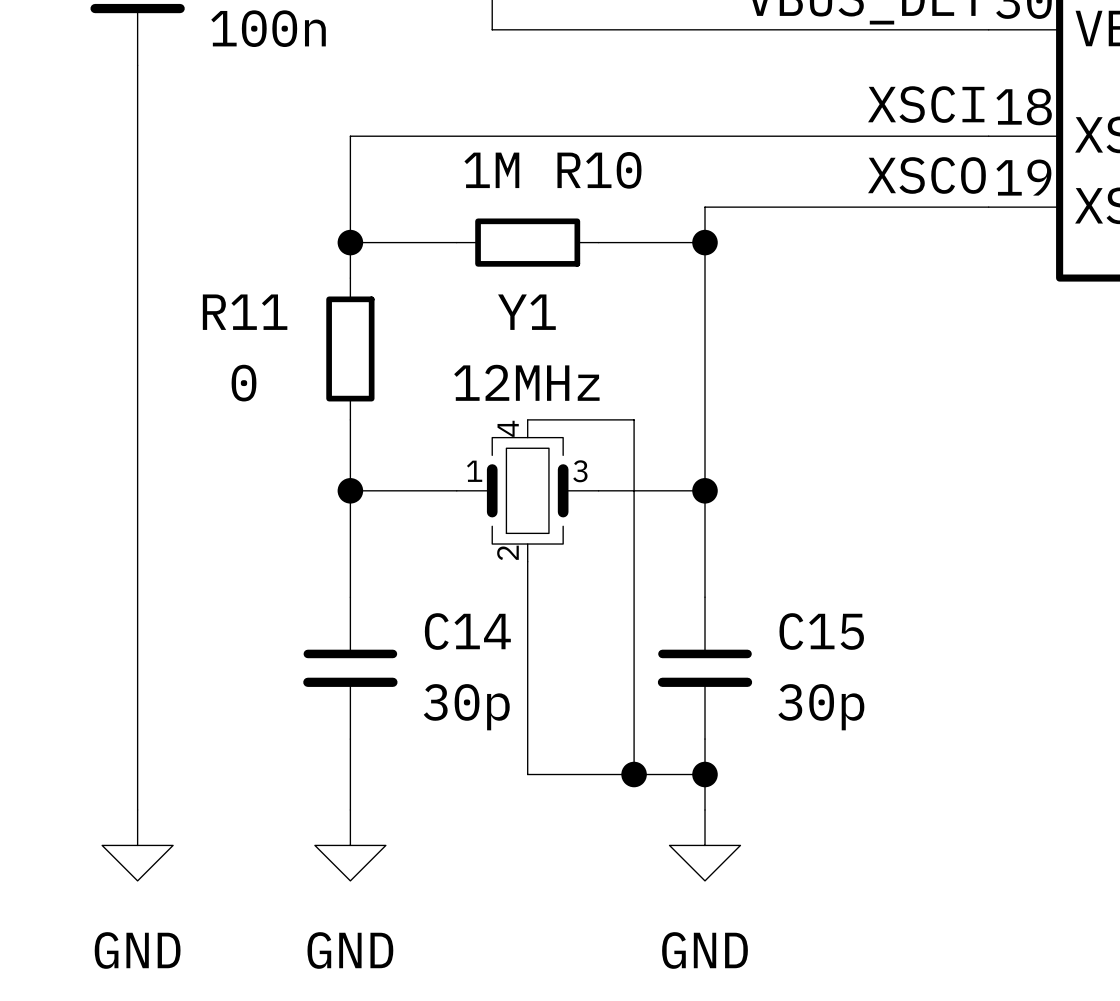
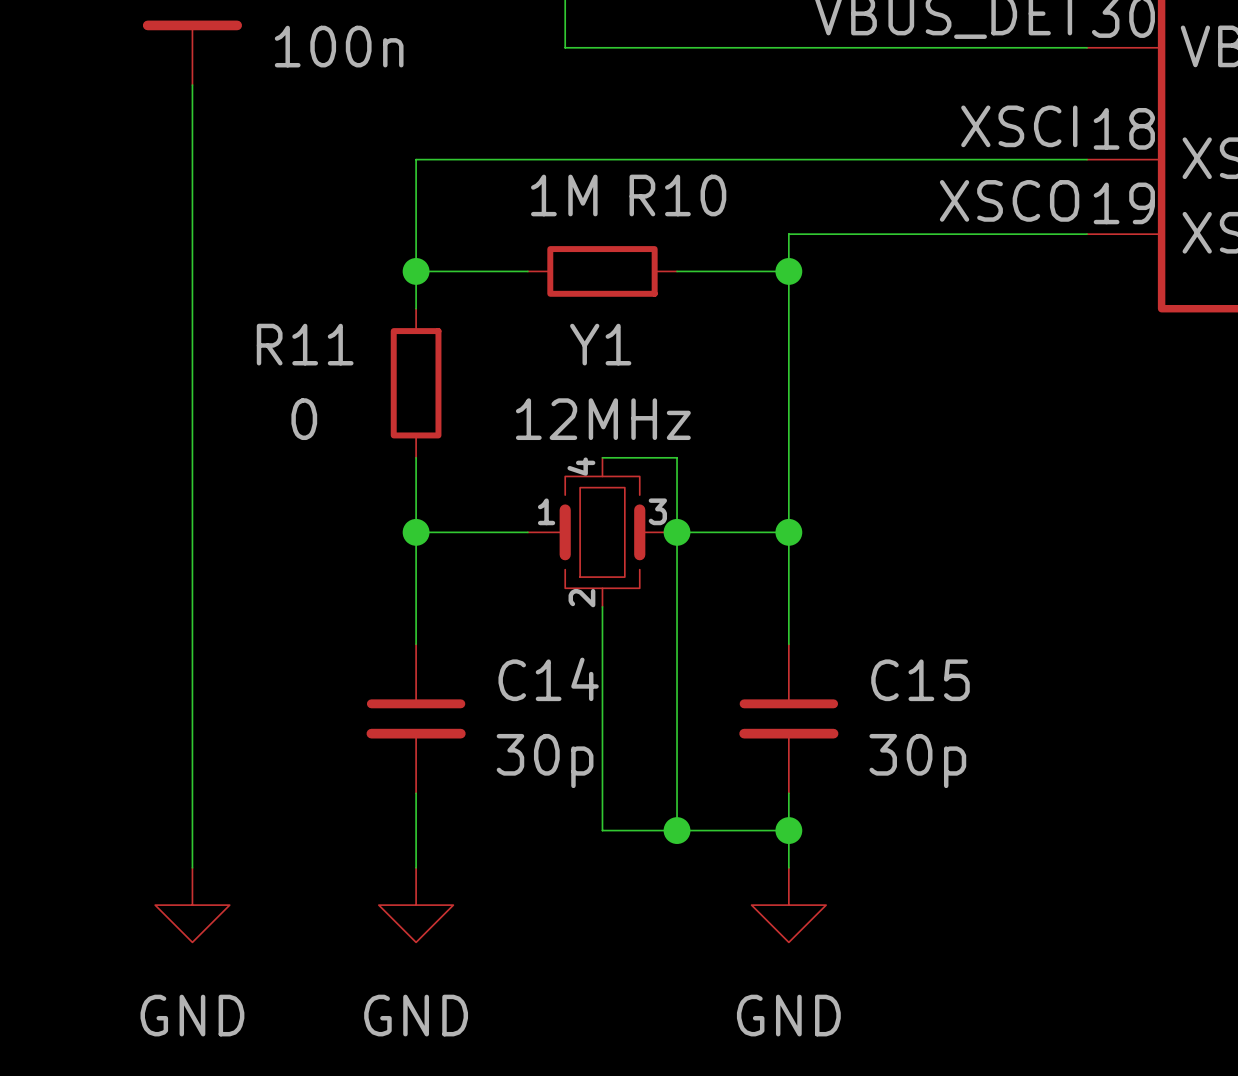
wire: (598, 419) (634, 419) (634, 774) -> (677, 457) (677, 830)
junction: none -> (677, 532)
junction position: (634, 774) -> (677, 830)

